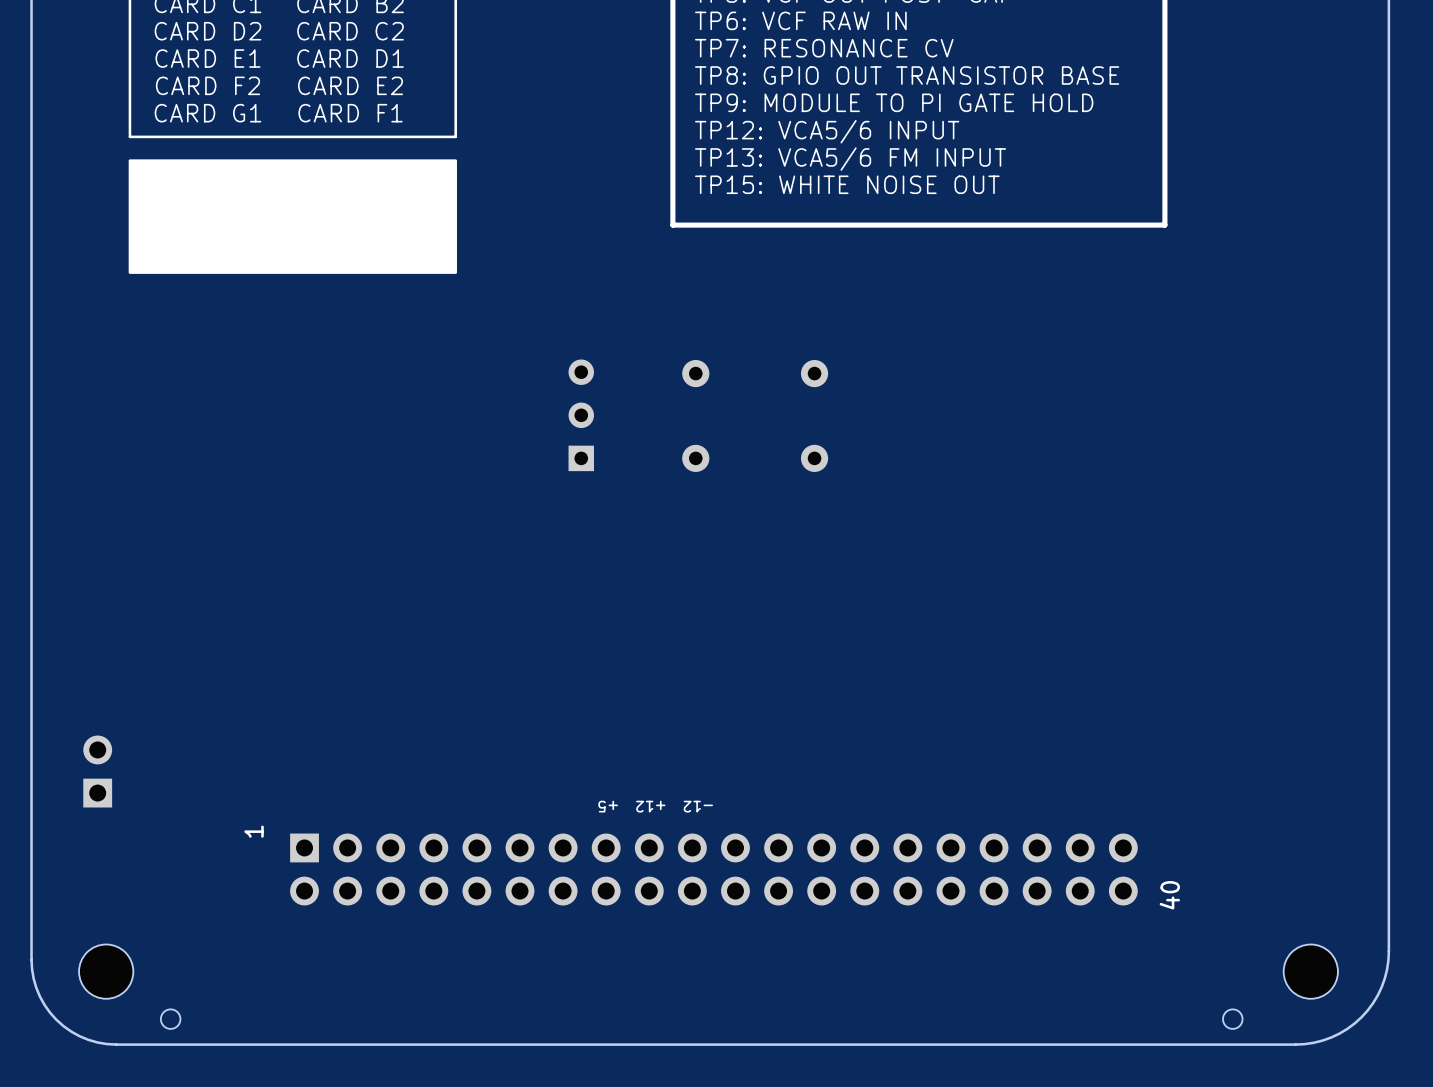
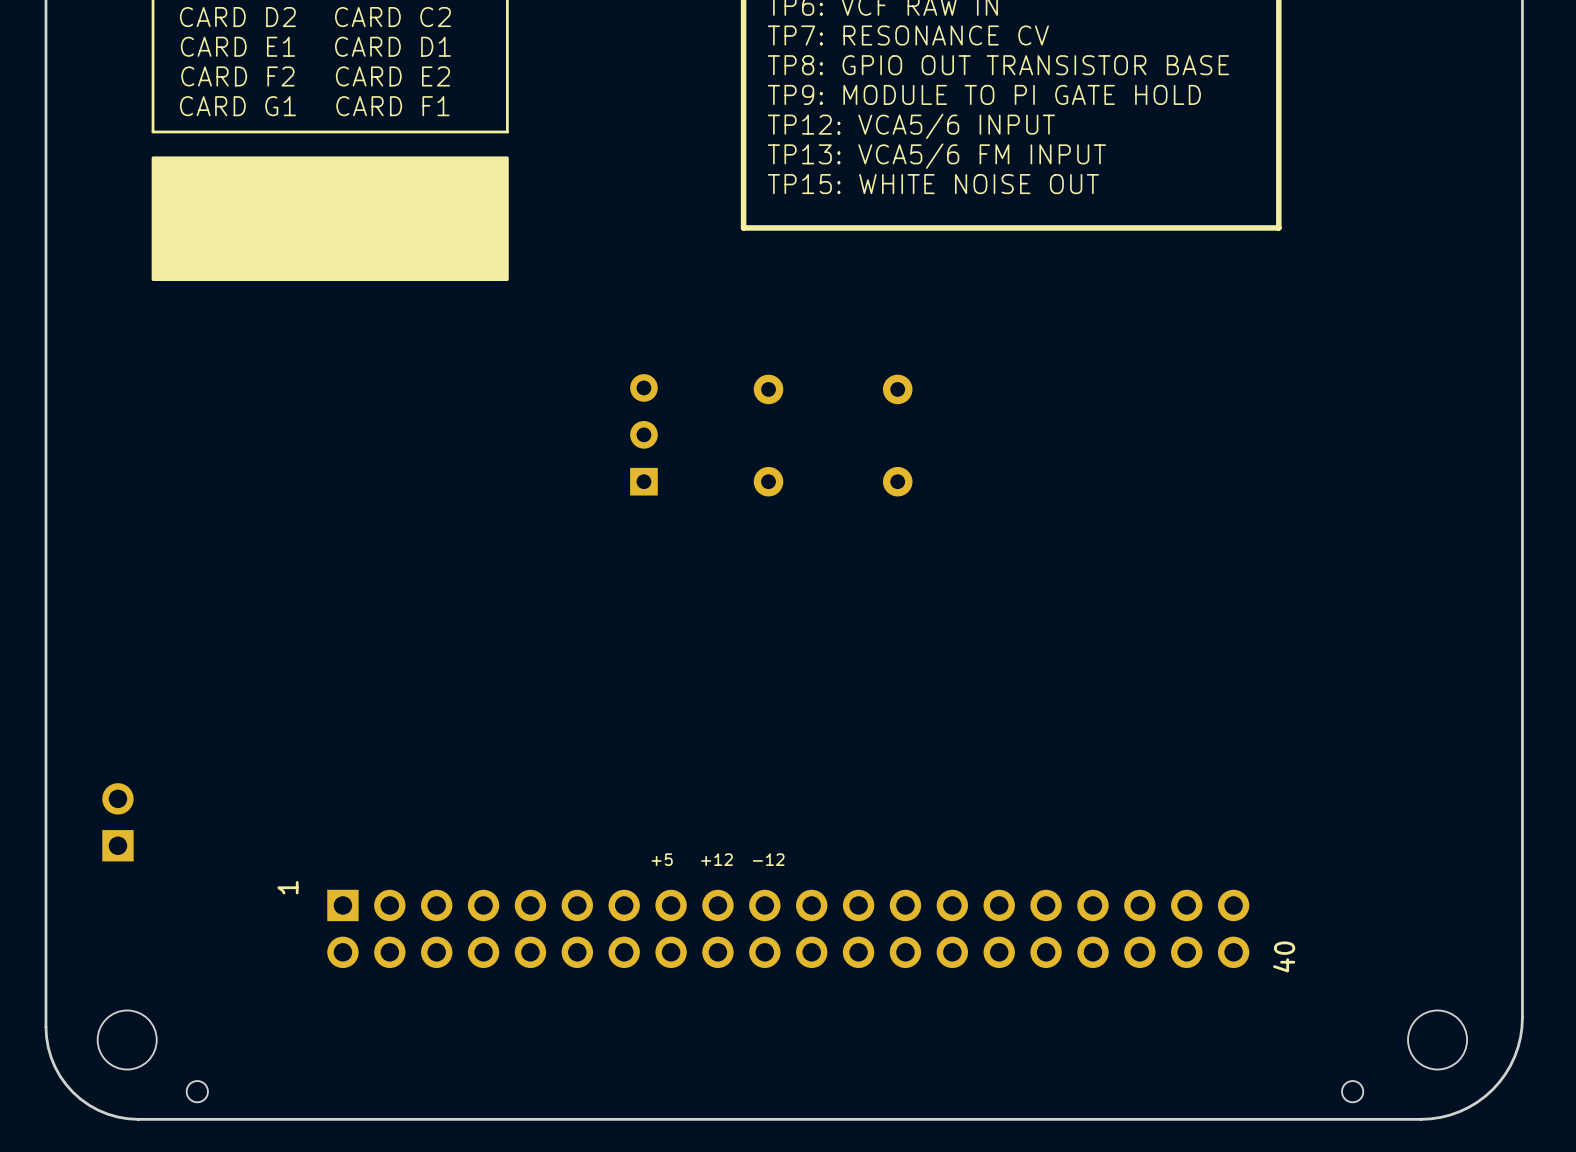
text: -12 +12 +5 (655, 806) -> +5 +12 -12 (718, 859)

